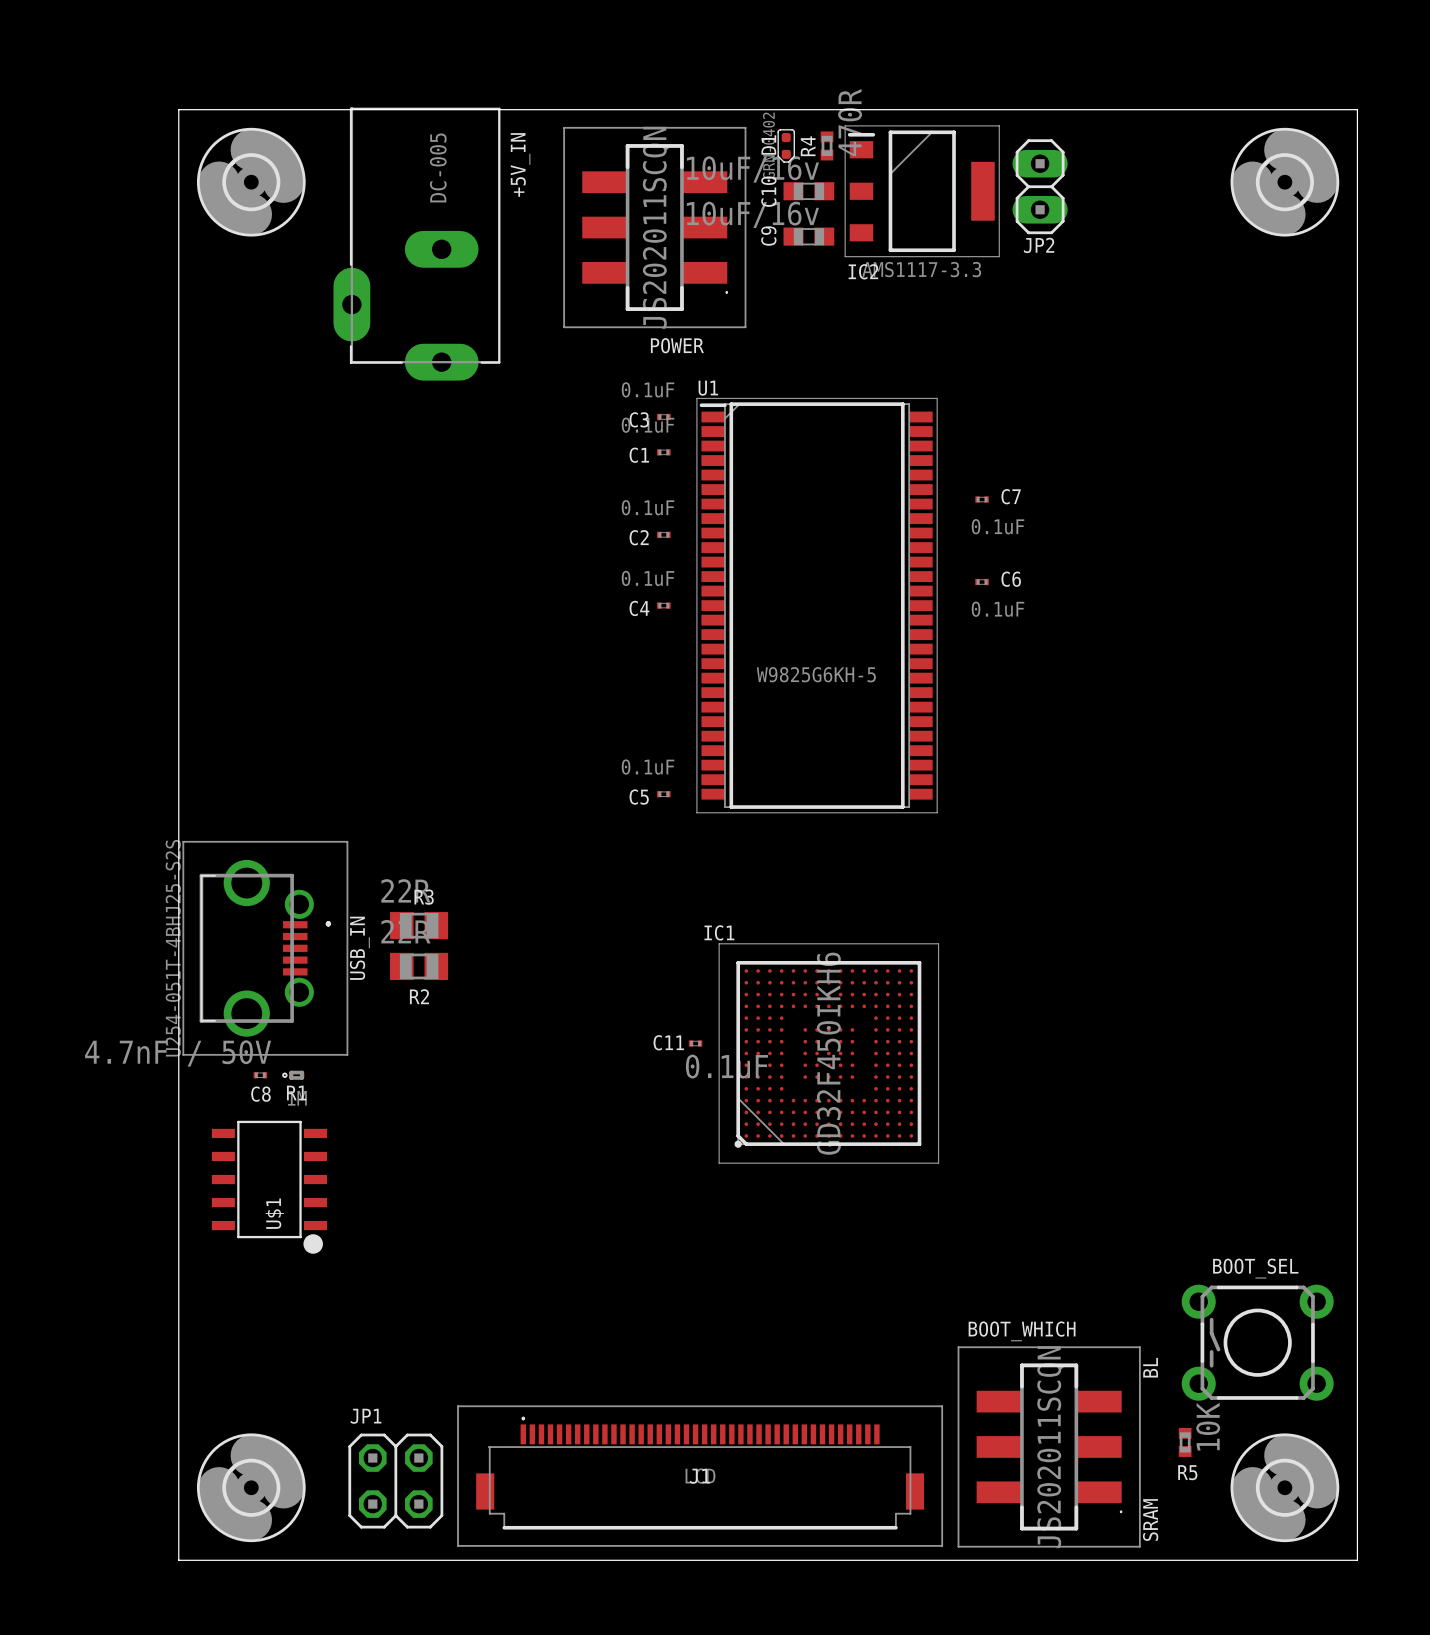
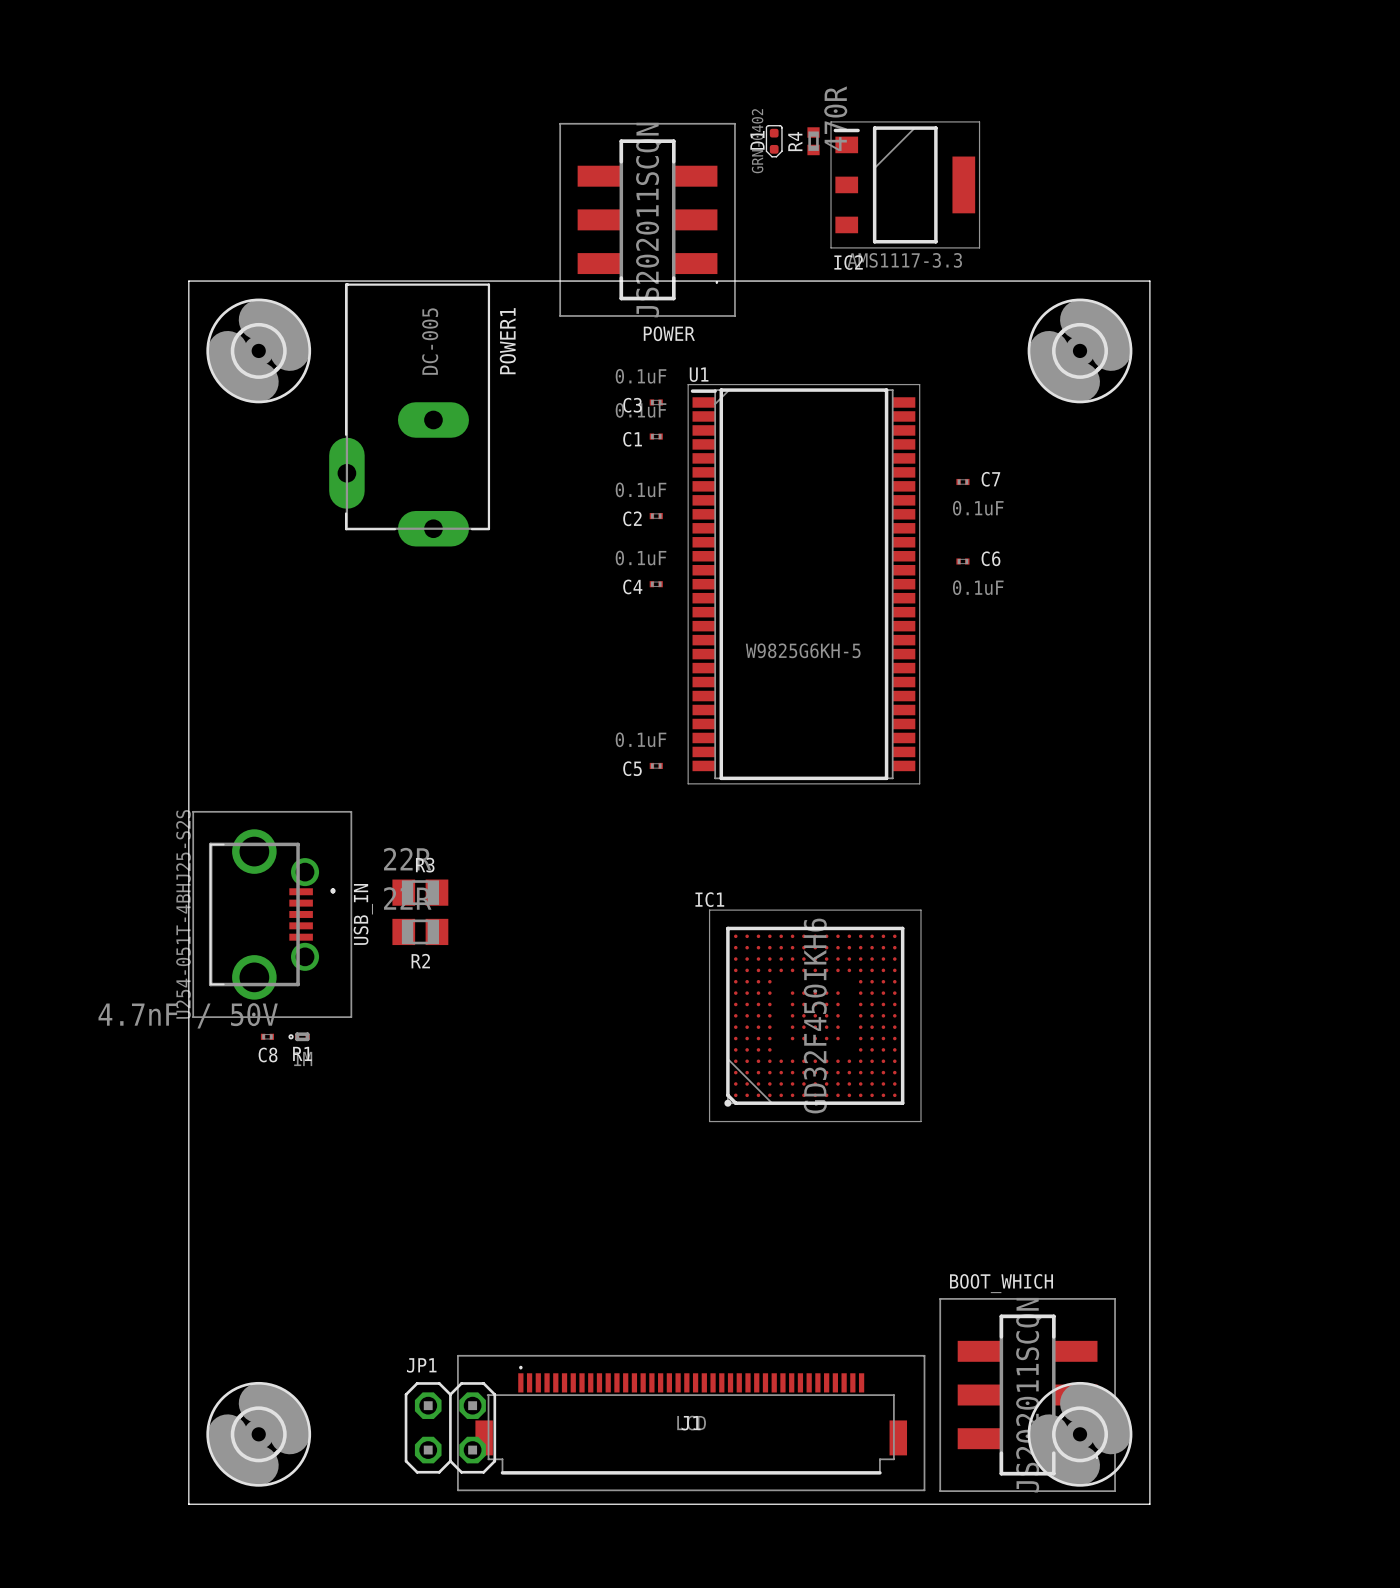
part position: (251, 182) -> (258, 350)
part position: (1284, 182) -> (1080, 350)
JP2: (1040, 186) -> none
C10: 10uF/16v (808, 191) -> none
C9: 10uF/16v (808, 236) -> none
+5V_IN: DC-005 (416, 244) -> none
board edge: (178, 291) (178, 109) (1357, 109) (1357, 1560) (1176, 1560) -> (188, 281) (1149, 281) (1149, 1504)
POWER1: none -> DC-005 (409, 414)
C11: 0.1uF (695, 1043) -> none
U$1: (269, 1187) -> none
BOOT_SEL: (1257, 1342) -> none
text: BL (1150, 1367) -> none
R5: 10K (1185, 1442) -> none
JP1 position: (395, 1481) -> (450, 1427)
part position: (1284, 1487) -> (1080, 1434)
text: SRAM (1150, 1520) -> none

